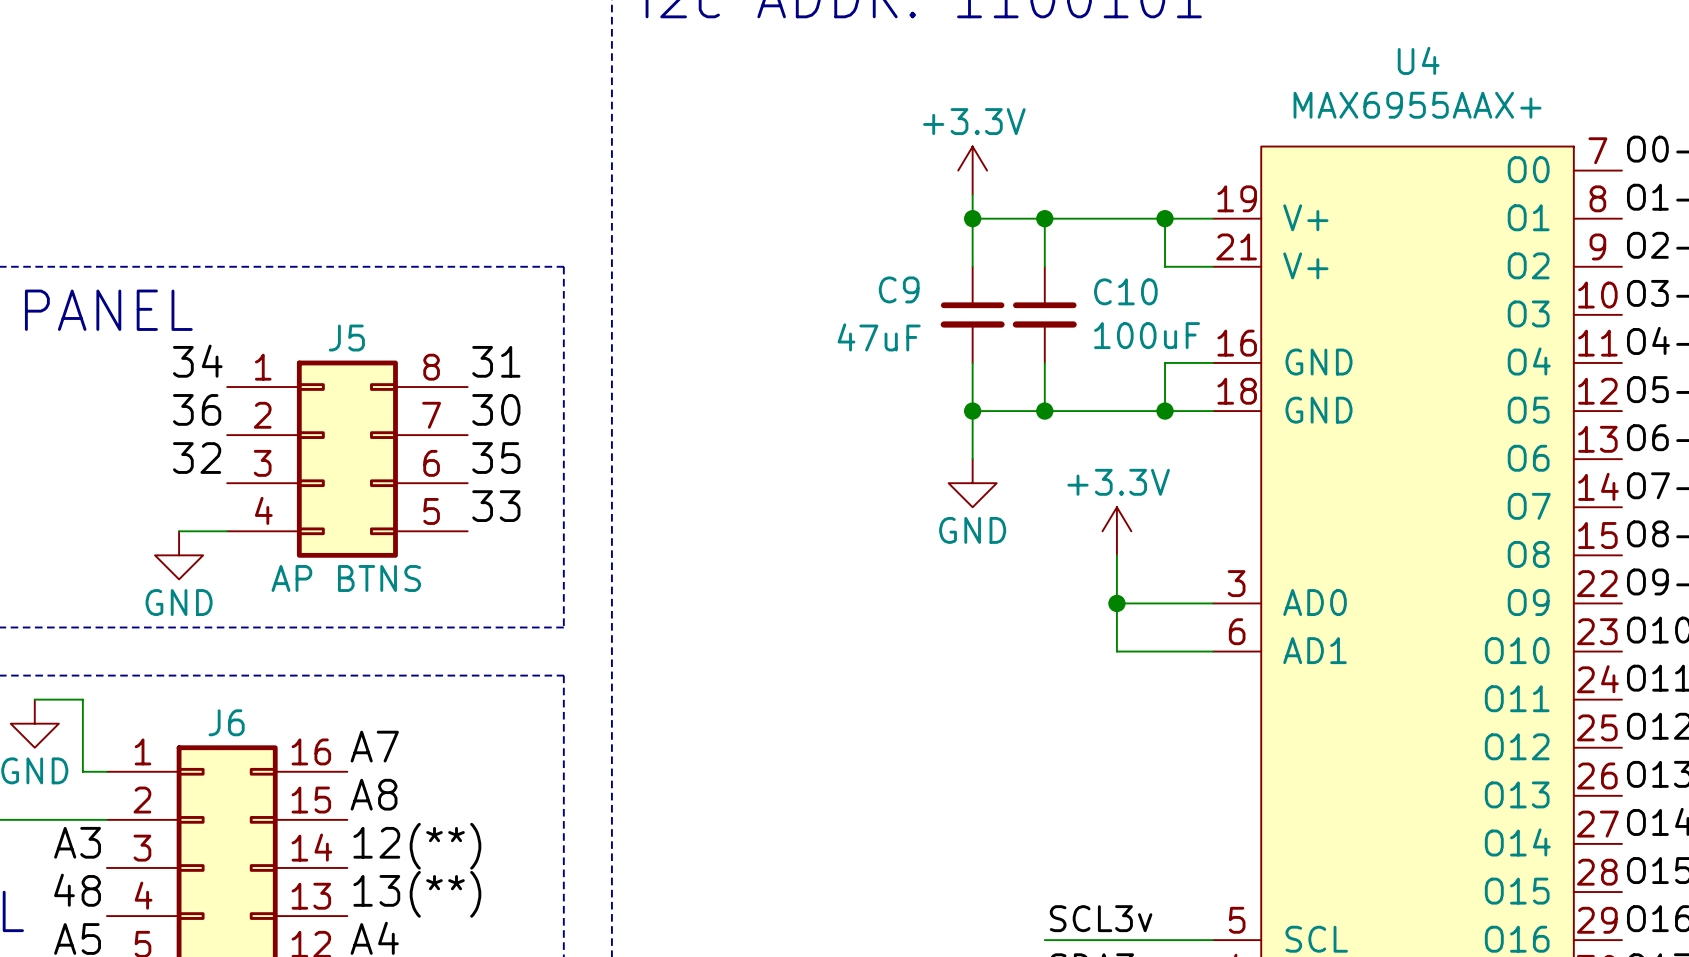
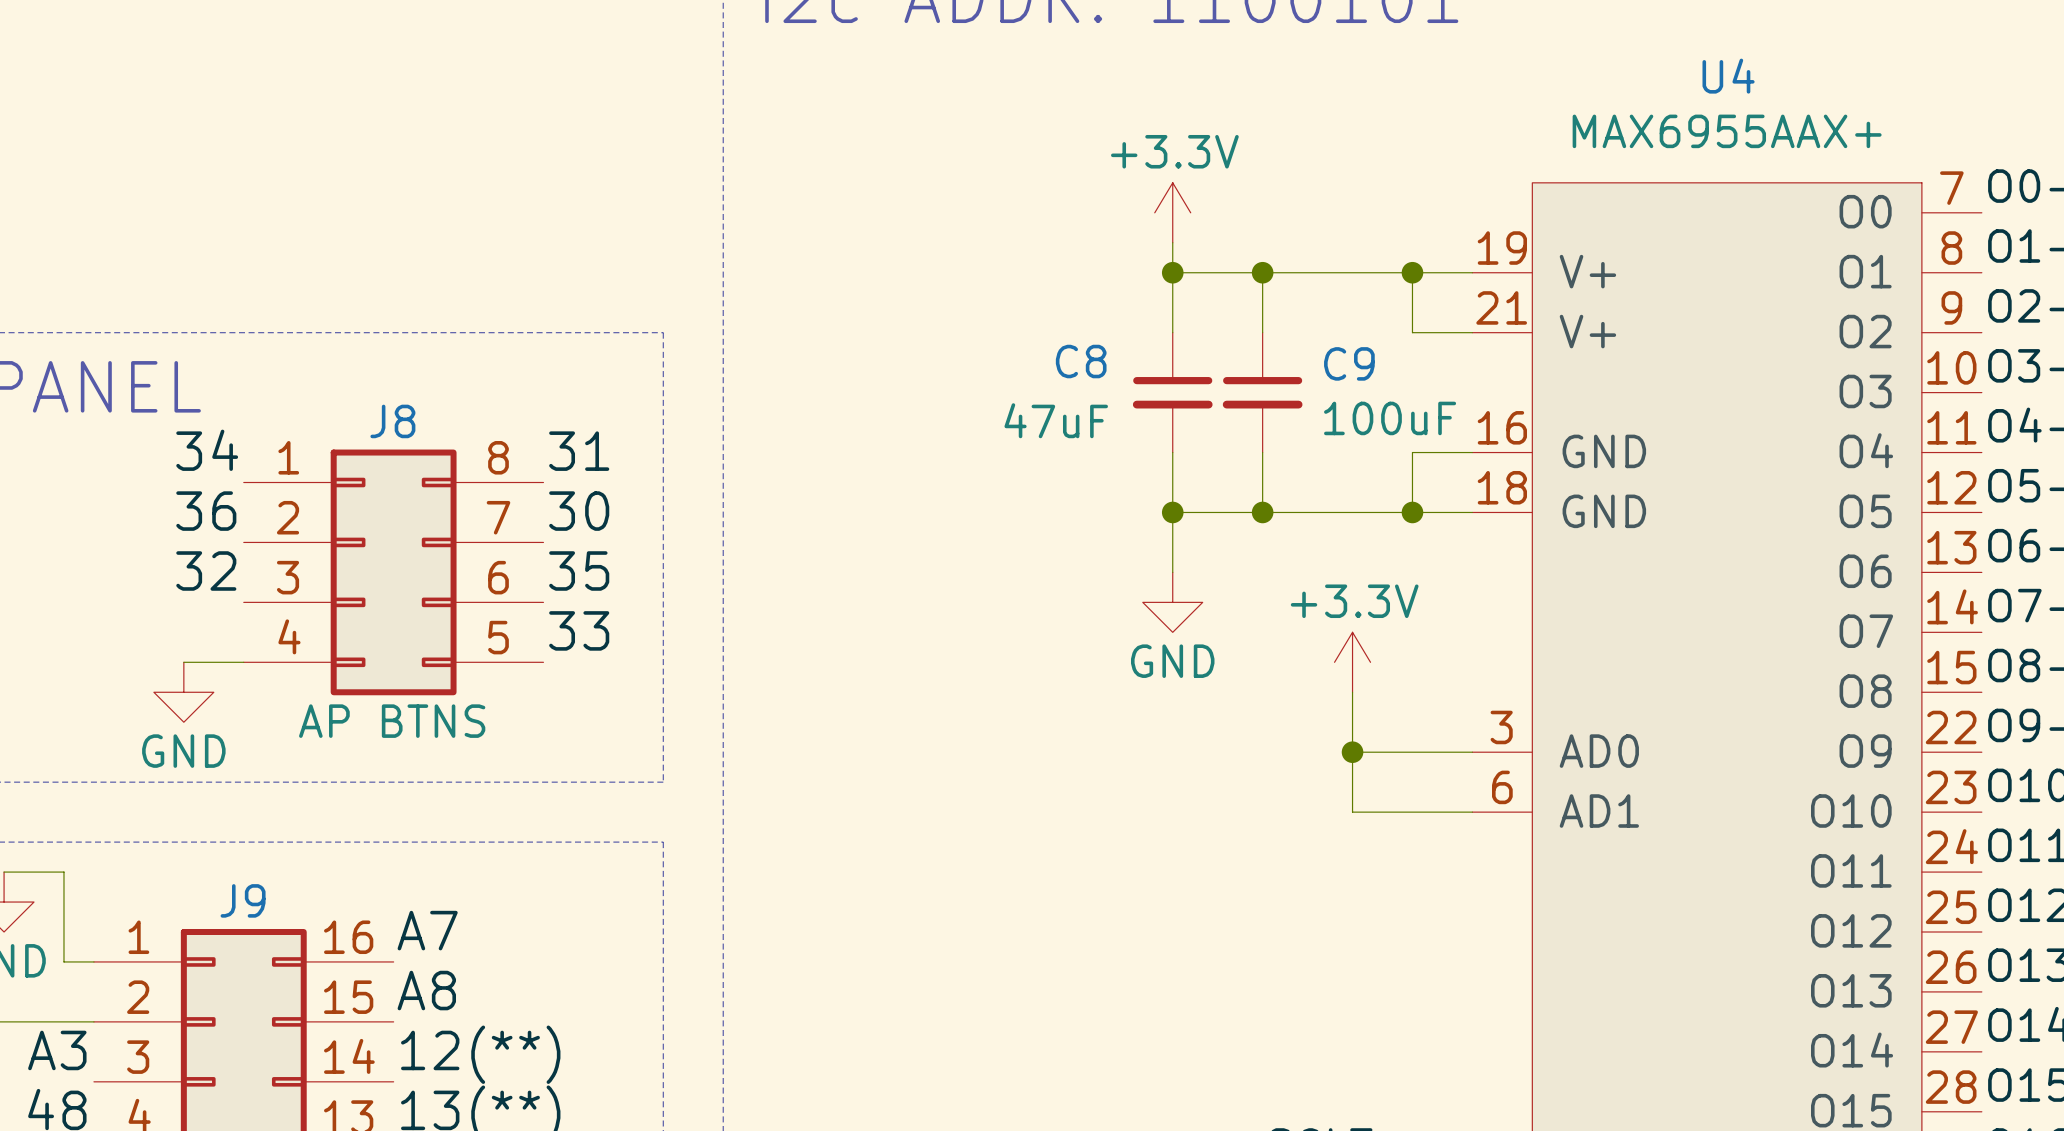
C9 name: C9 (899, 289) -> C8 (1081, 361)
C10 name: C10 (1125, 291) -> C9 (1349, 363)
J5 name: J5 (346, 338) -> J8 (392, 421)
J6 name: J6 (226, 722) -> J9 (243, 900)

